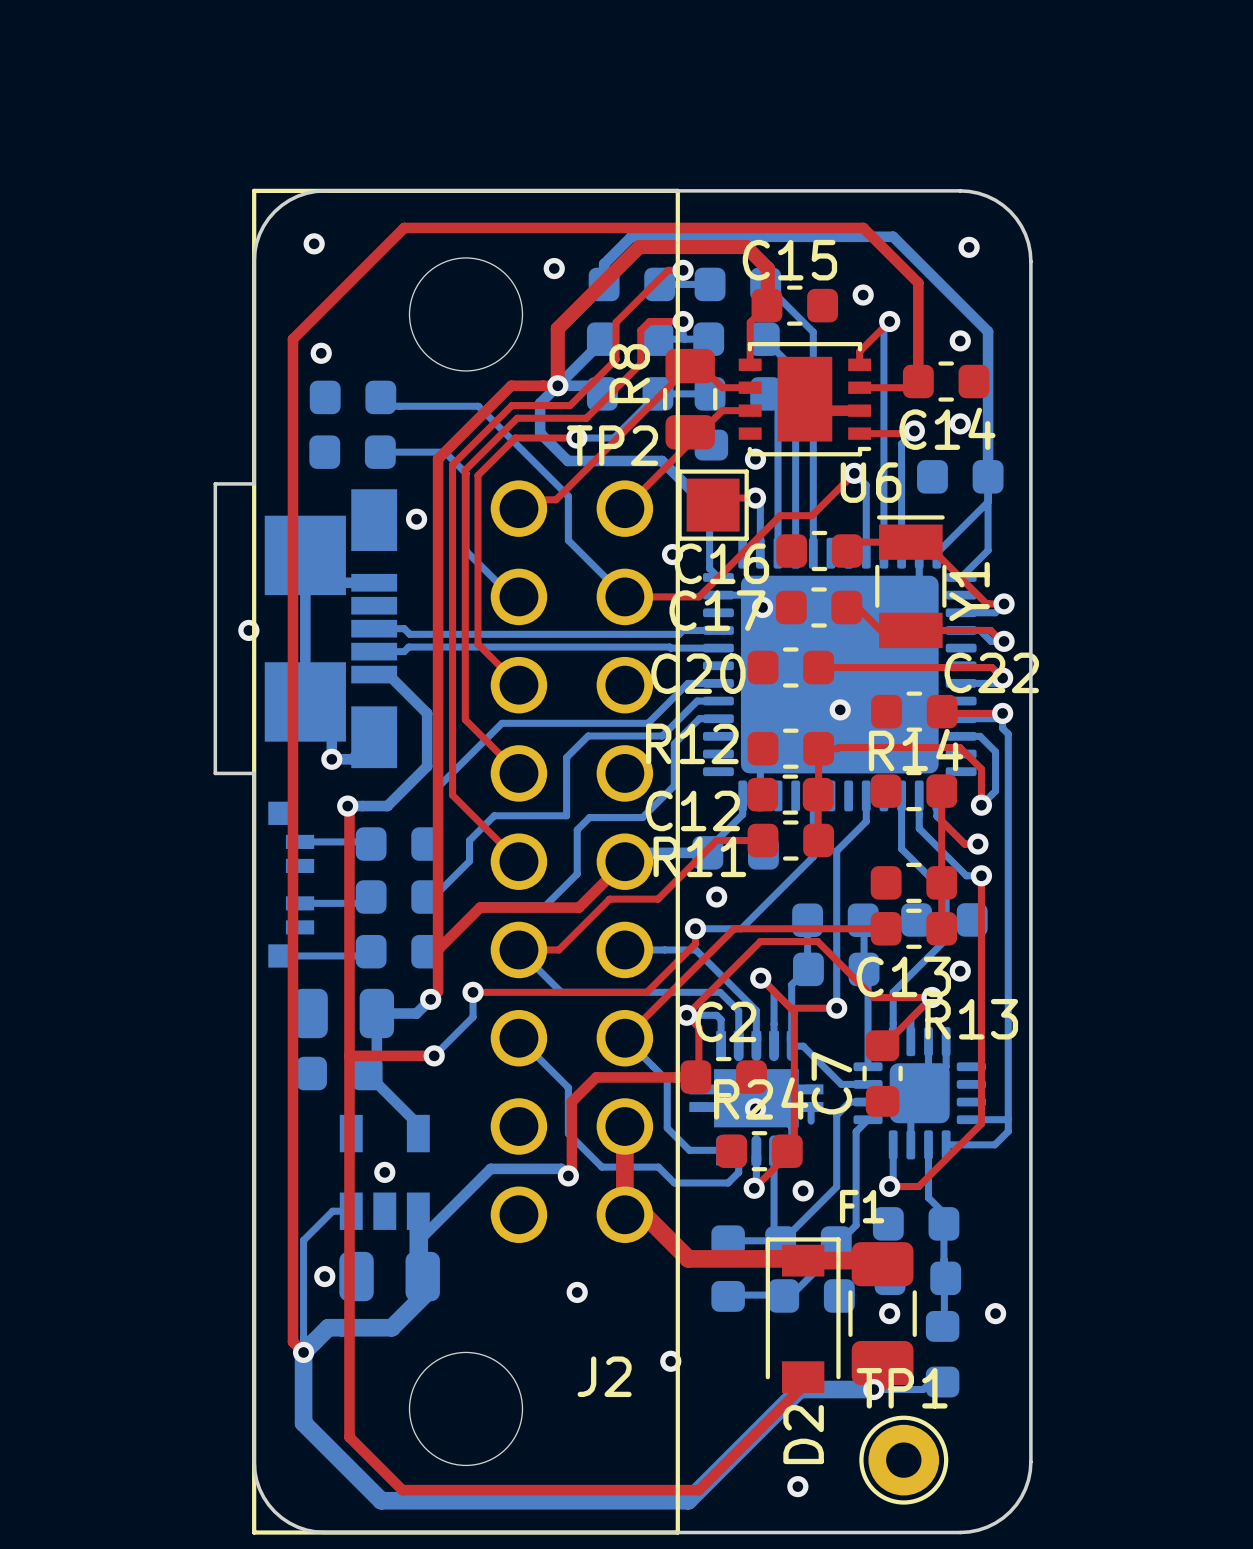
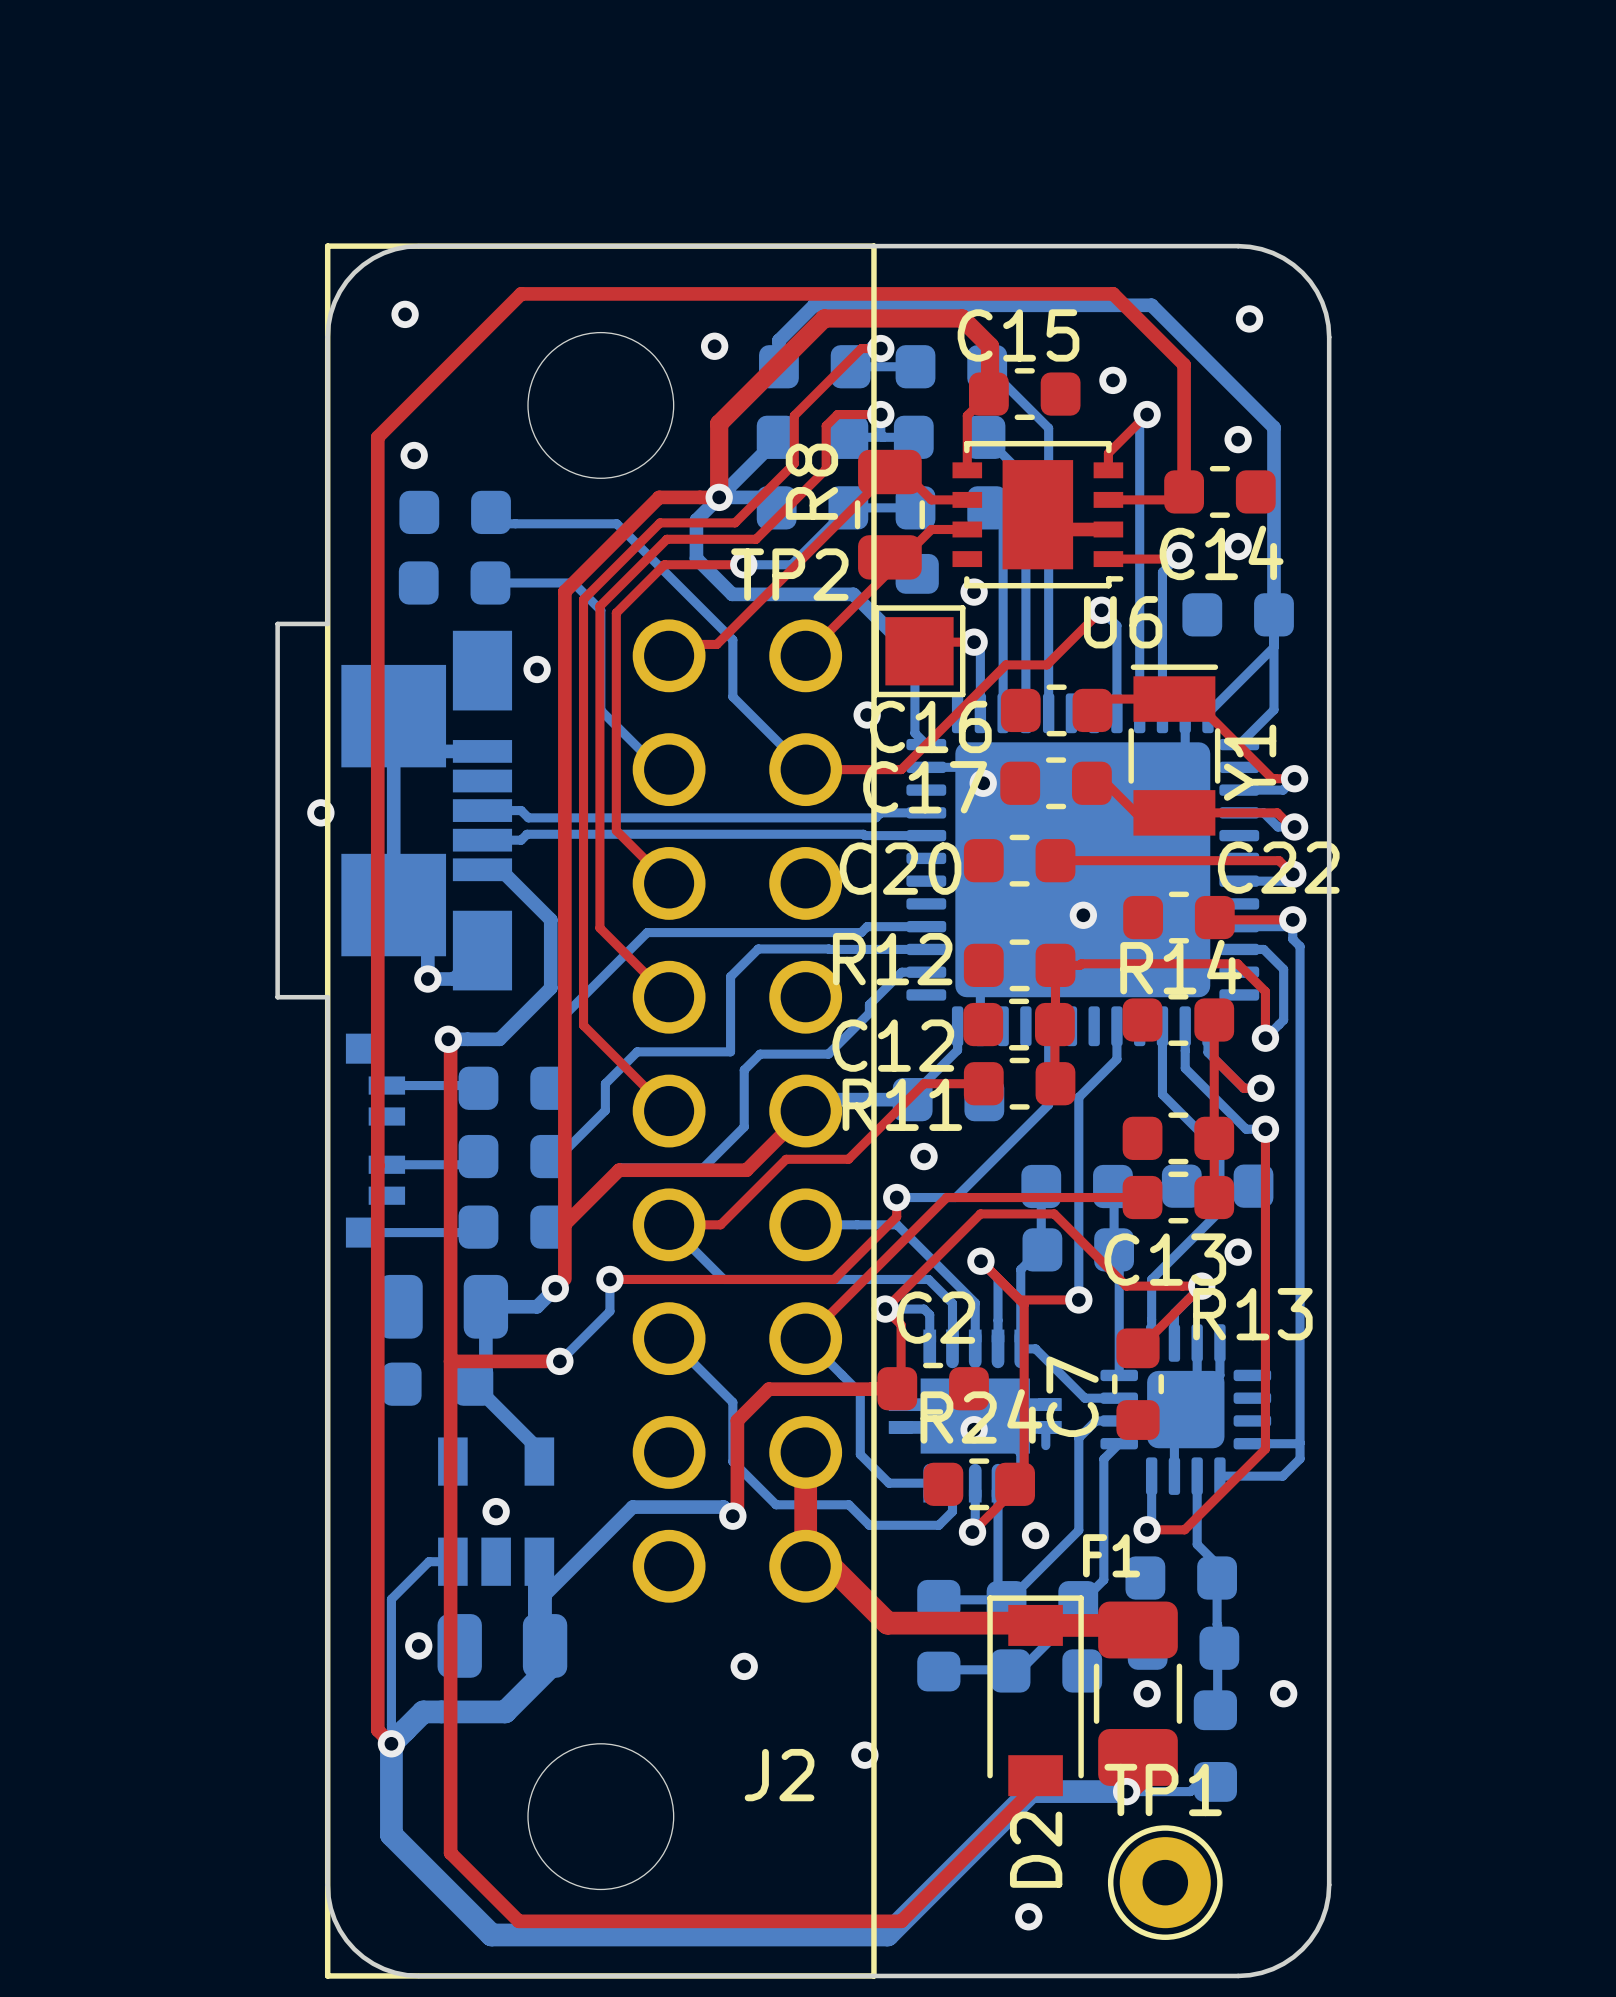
bottom track: (718, 683) (687, 683) (648, 723) -> (901, 926) (867, 926) (861, 932) (835, 932)
bottom track: (718, 701) (697, 701) (662, 736) (642, 736) -> (926, 949) (829, 949)
bottom track: (699, 718) (674, 743) (674, 779) -> (926, 972) (901, 972) (869, 1004)

